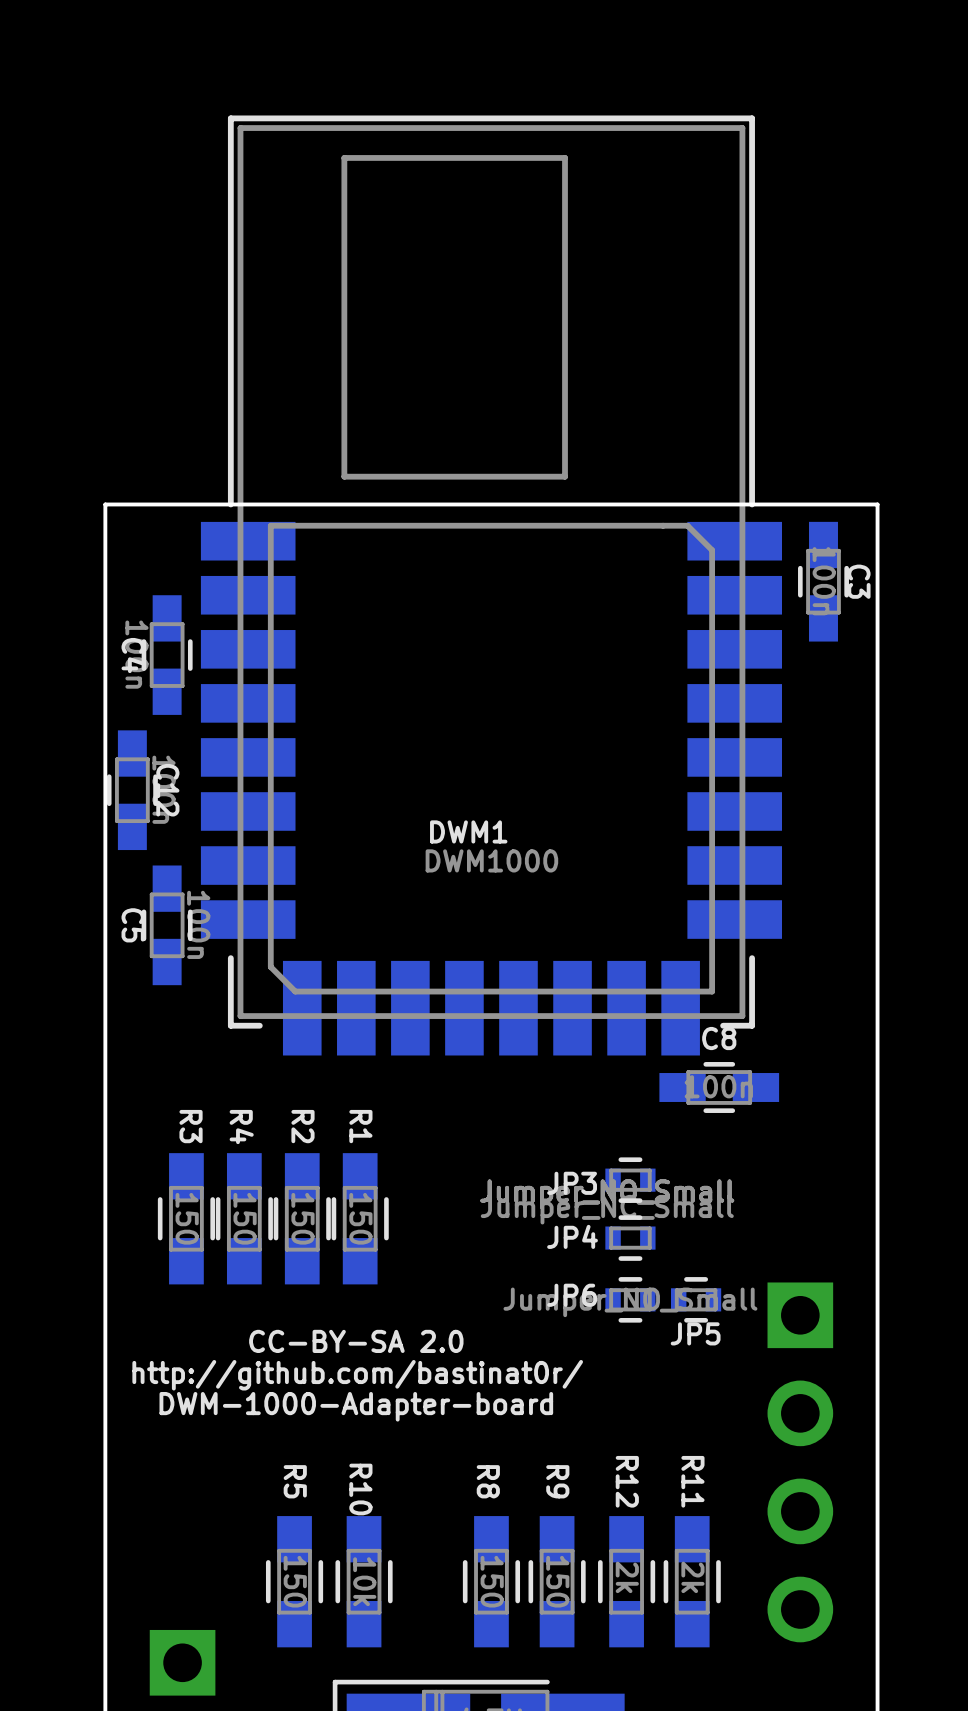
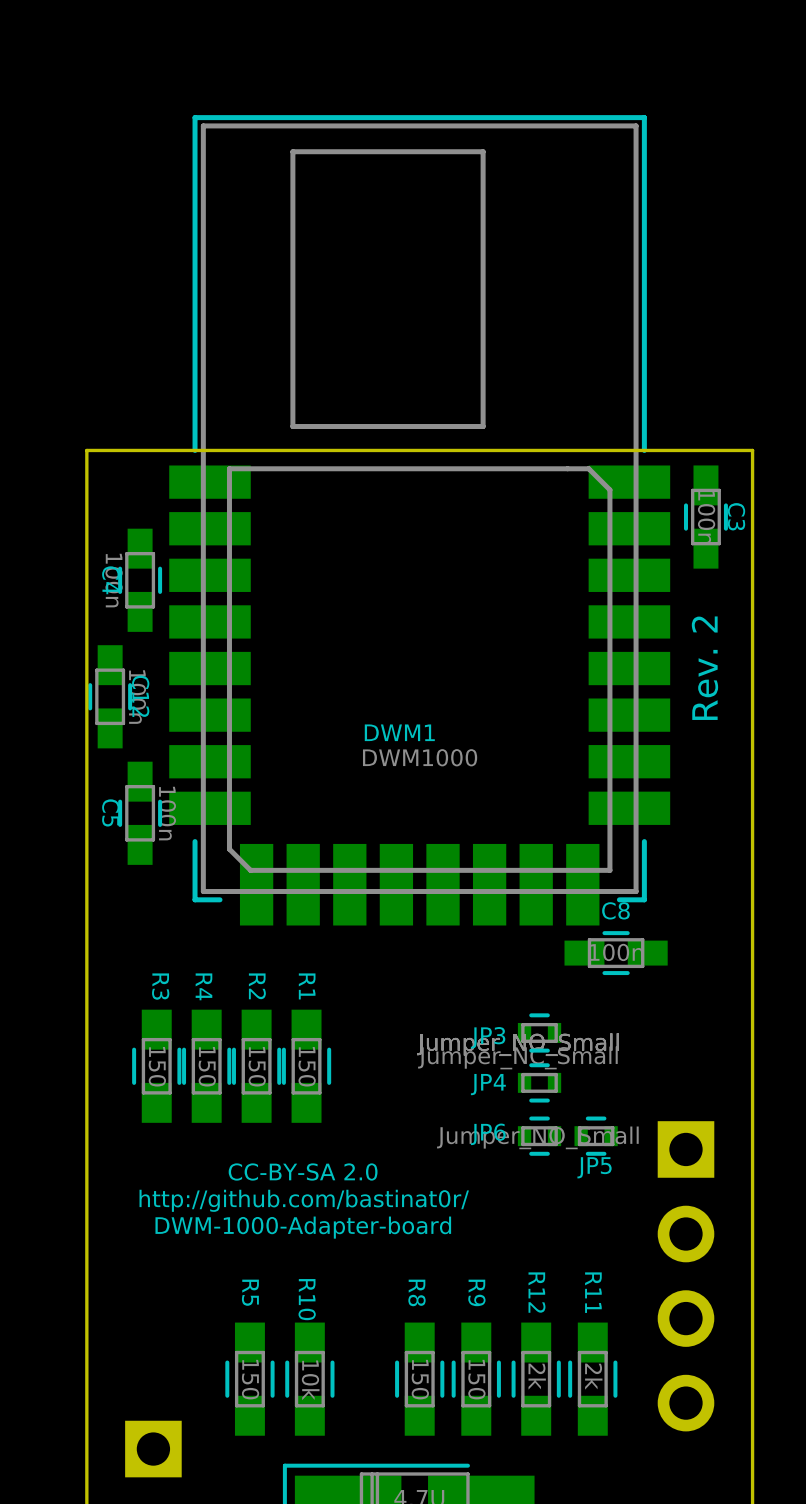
text: none -> Rev. 2 (704, 668)

